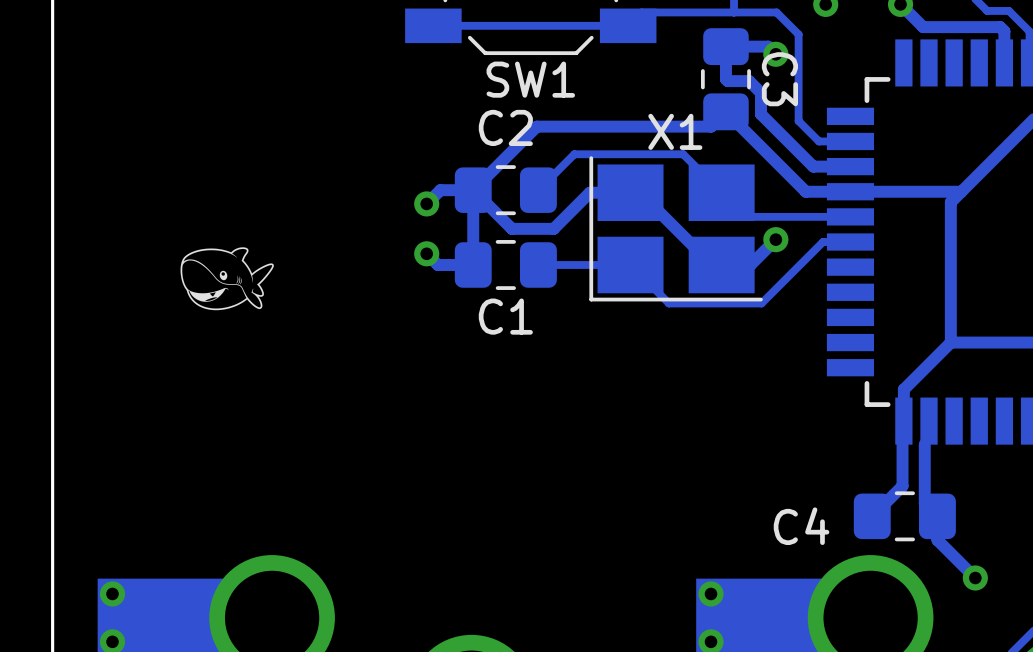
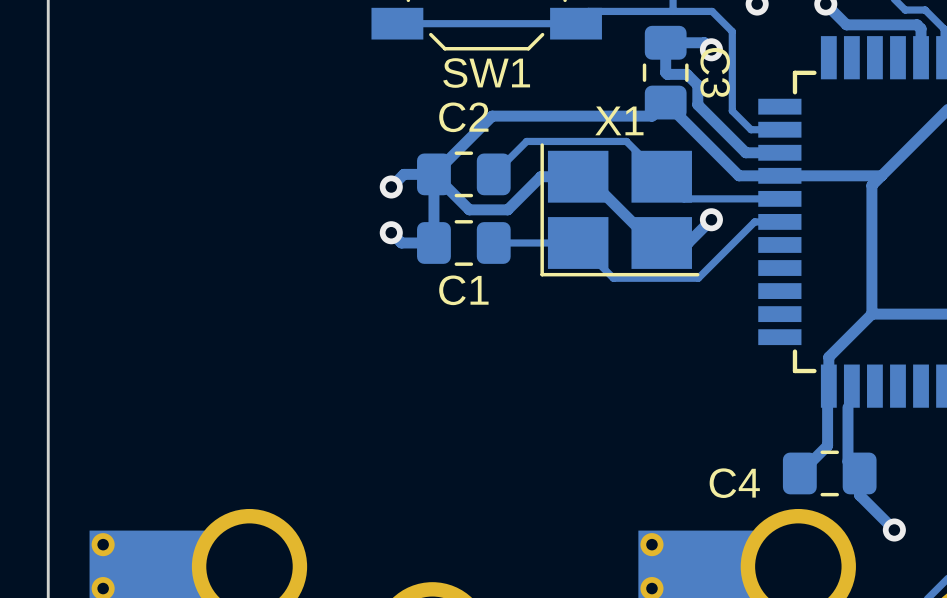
drawing: [180, 247, 274, 311] -> none

